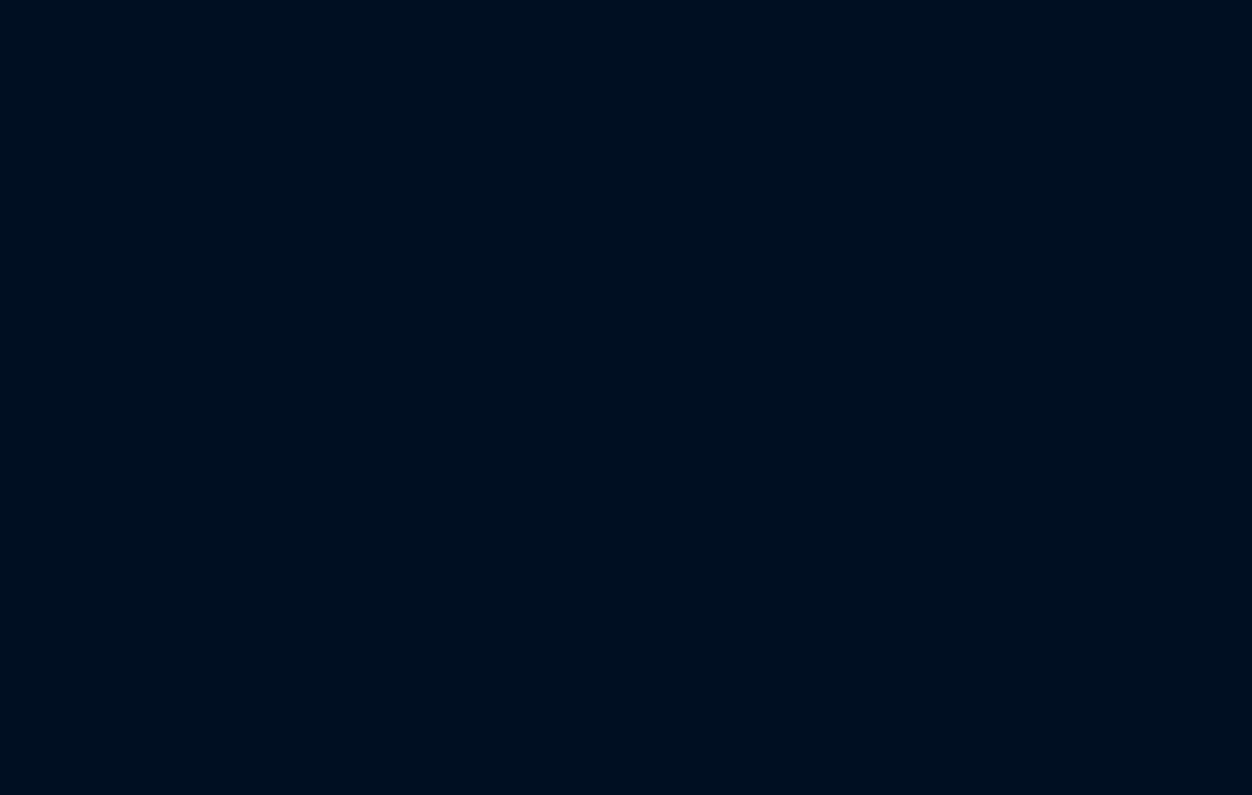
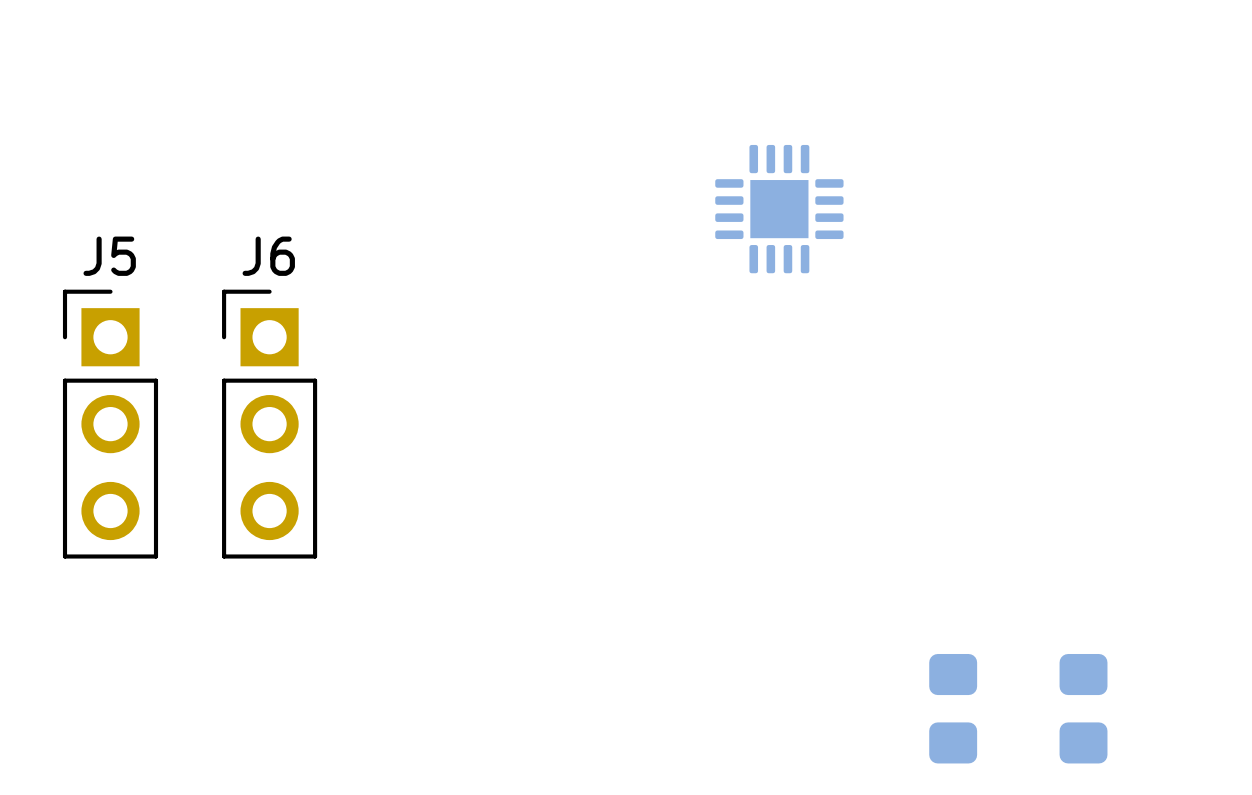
part: none -> (779, 209)
J5: none -> (110, 424)
J6: none -> (269, 424)
part: none -> (953, 708)
part: none -> (1083, 708)

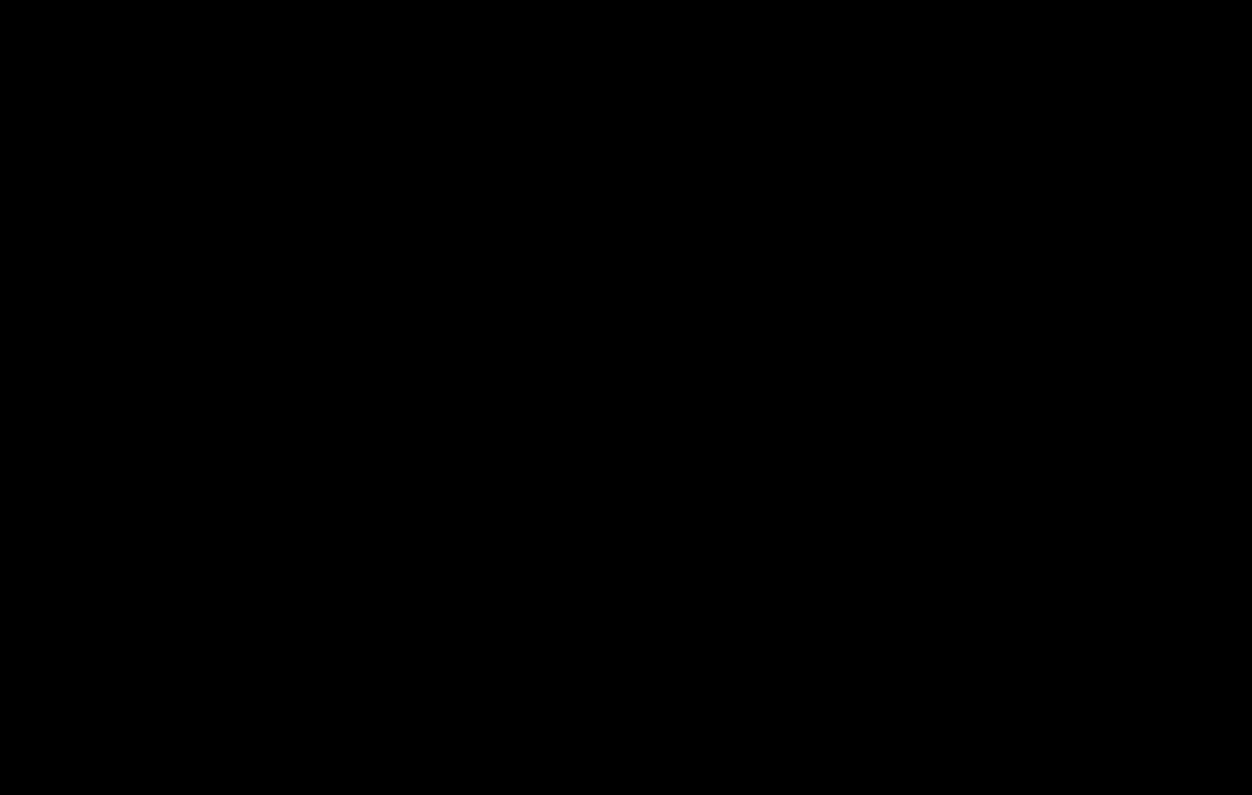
part: (779, 209) -> none
J5: (110, 424) -> none
J6: (269, 424) -> none
part: (953, 708) -> none
part: (1083, 708) -> none

